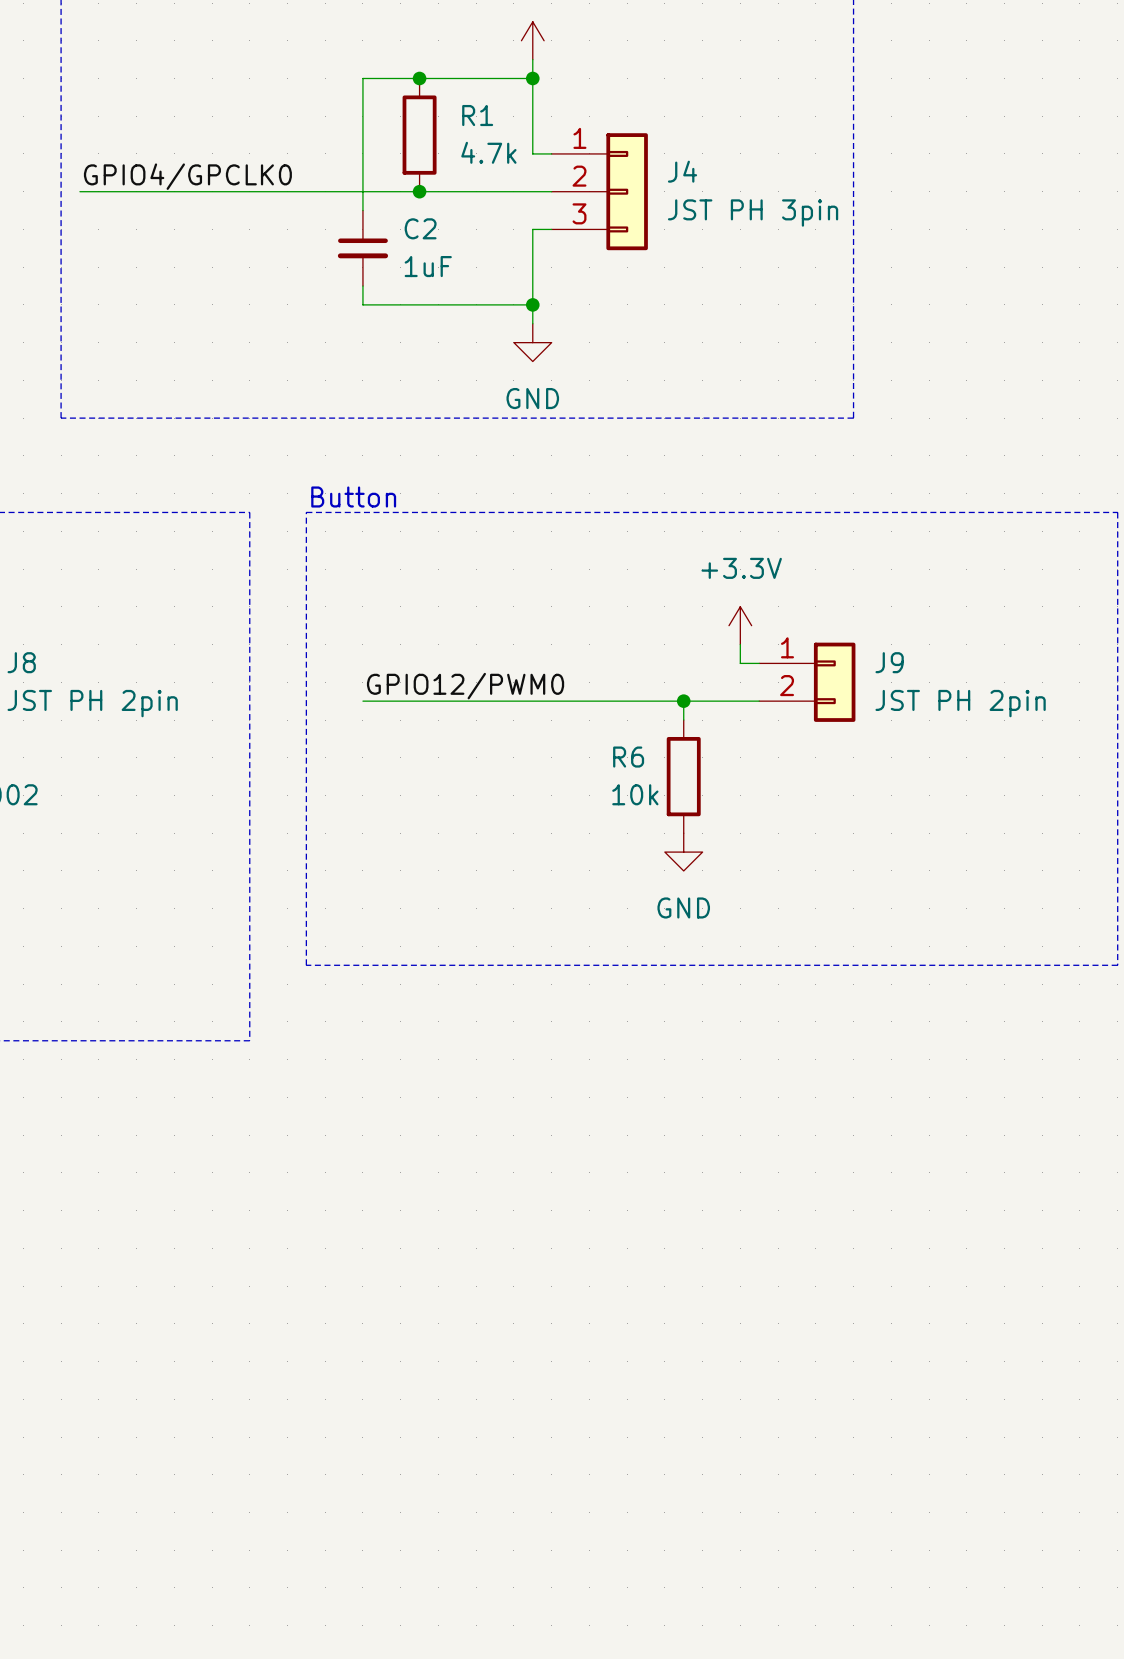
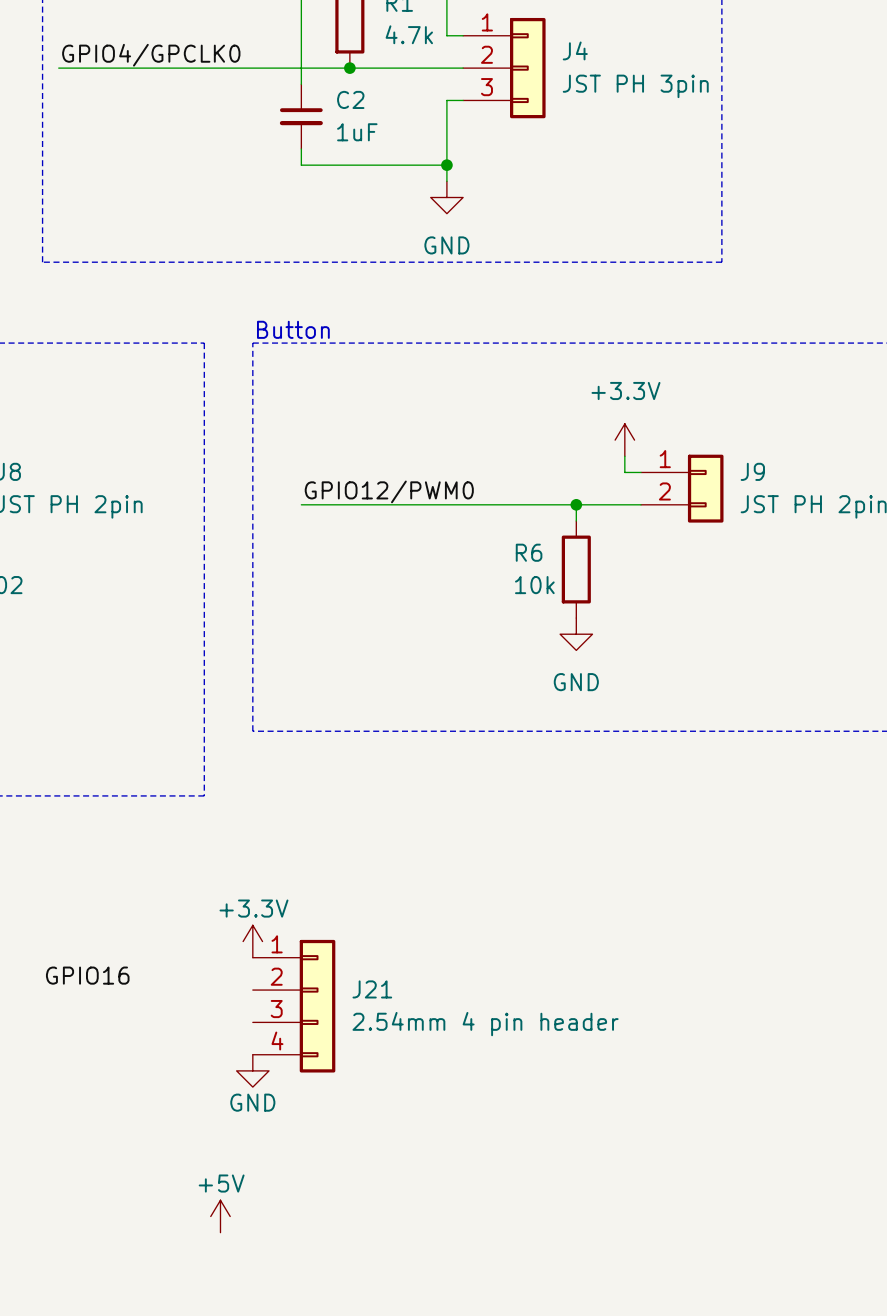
power symbol: none -> +3.3V (252, 941)
label: none -> GPIO16 (87, 975)
J21: none -> 2.54mm 4 pin header (294, 1006)
power symbol: none -> GND (252, 1070)
power symbol: none -> +5V (220, 1216)

